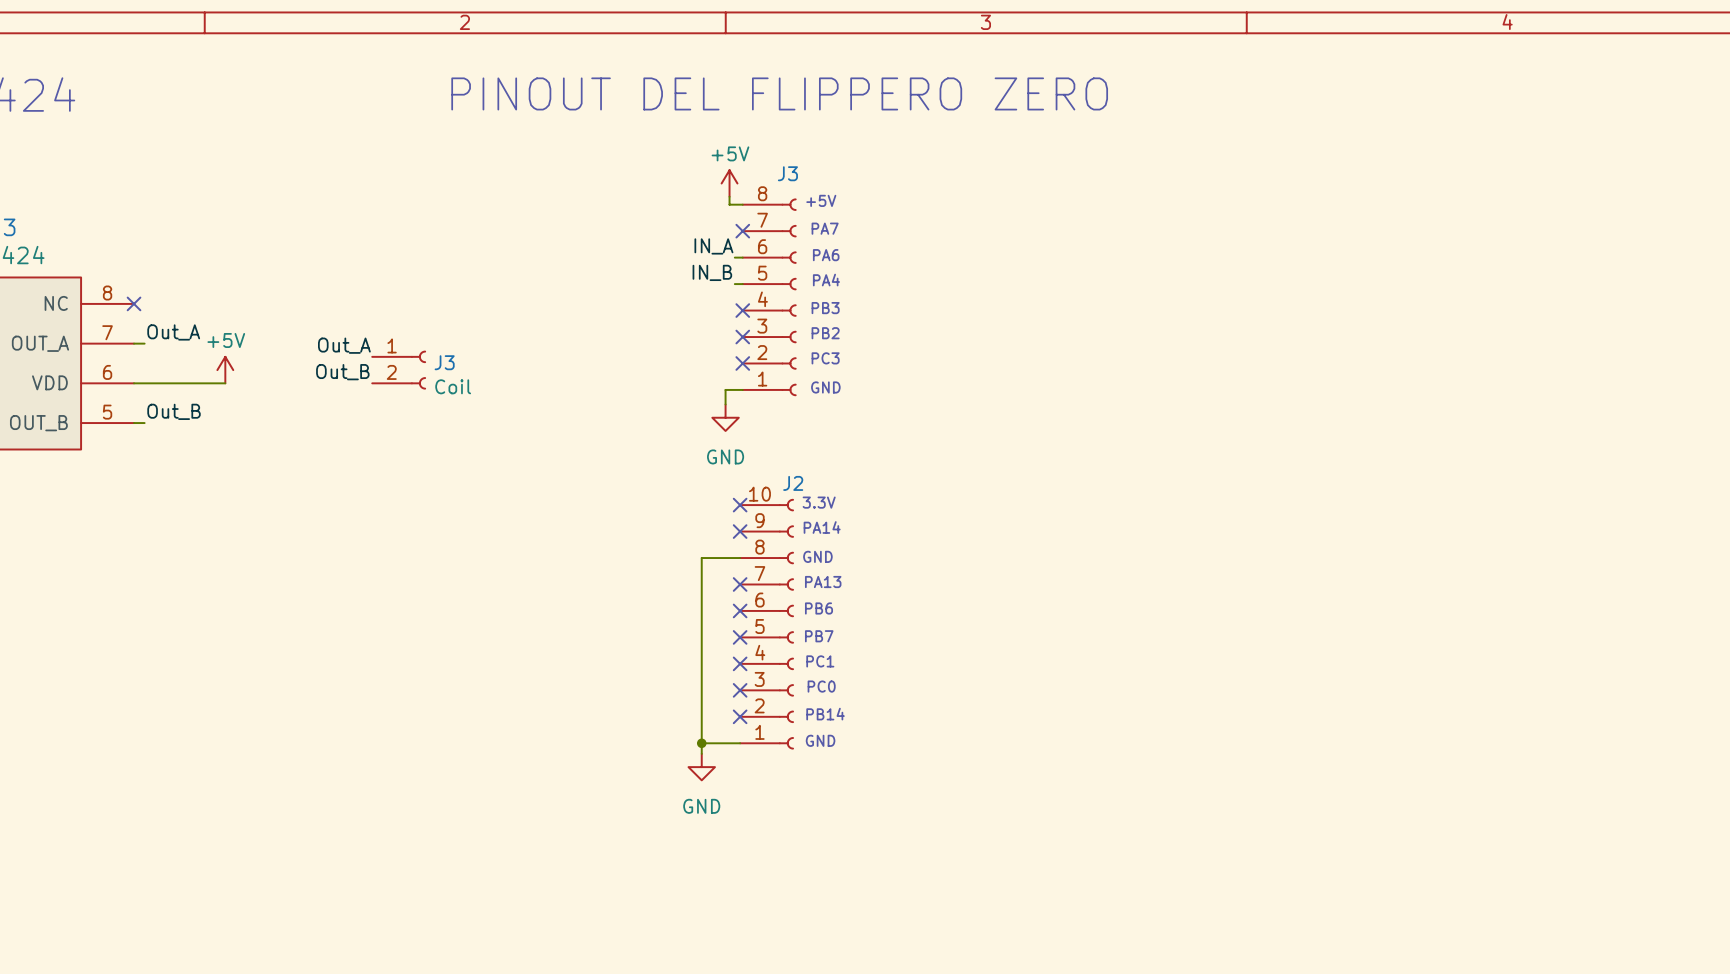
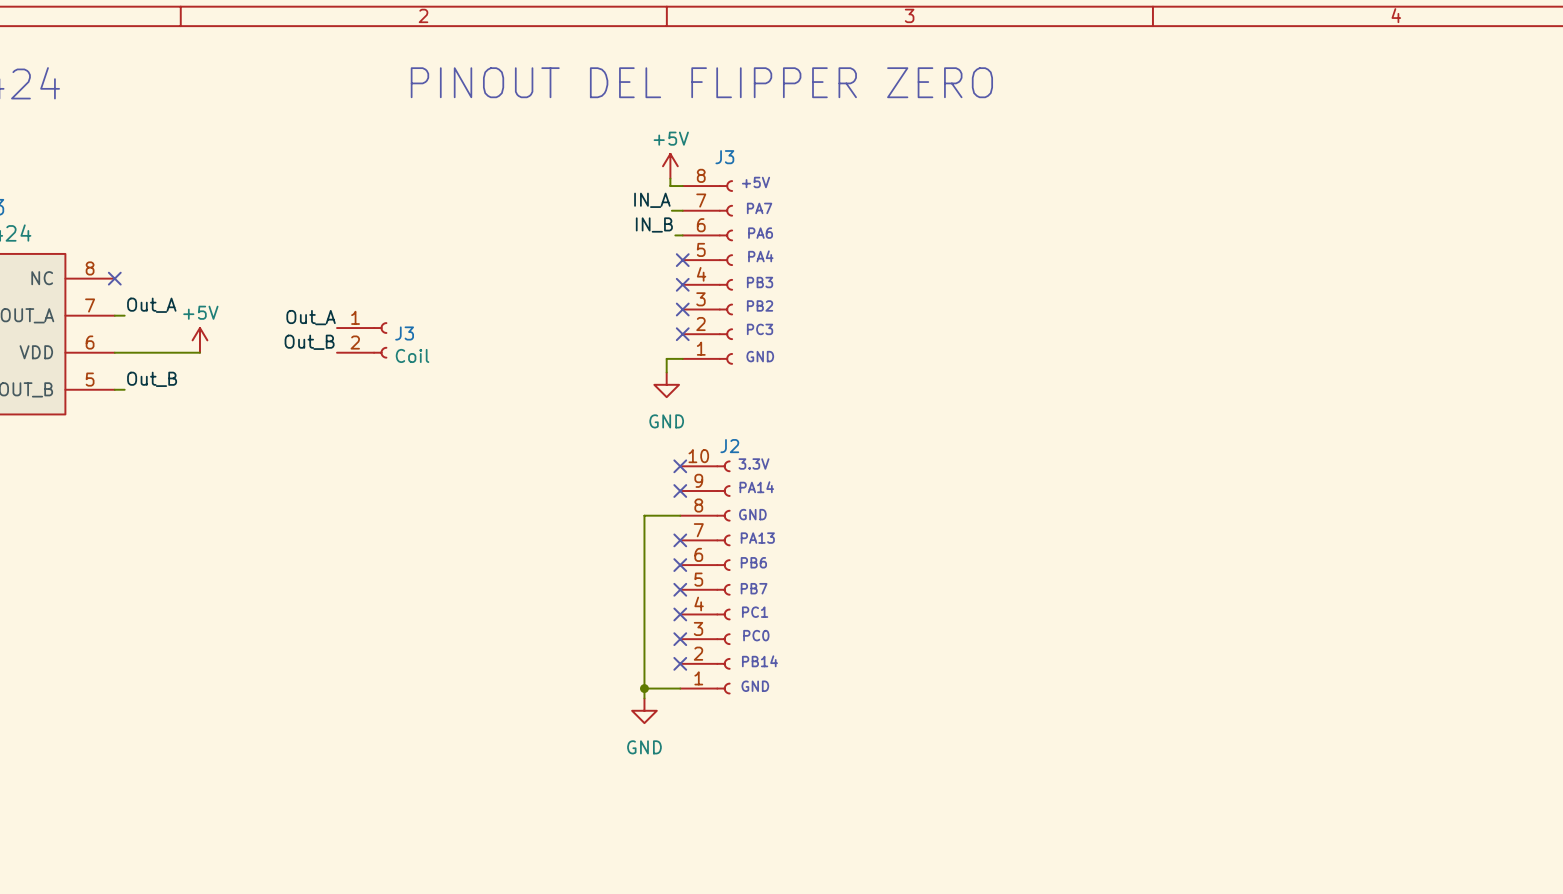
text: PINOUT DEL FLIPPERO ZERO (779, 93) -> PINOUT DEL FLIPPER ZERO (701, 82)
label: none -> IN_A (652, 200)
wire: none -> (671, 210) (682, 210)
no-connect mark position: (742, 231) -> (682, 260)
label: IN_A (713, 246) -> IN_B (654, 224)
label: IN_B (712, 272) -> none
wire: (734, 284) (742, 284) -> none

